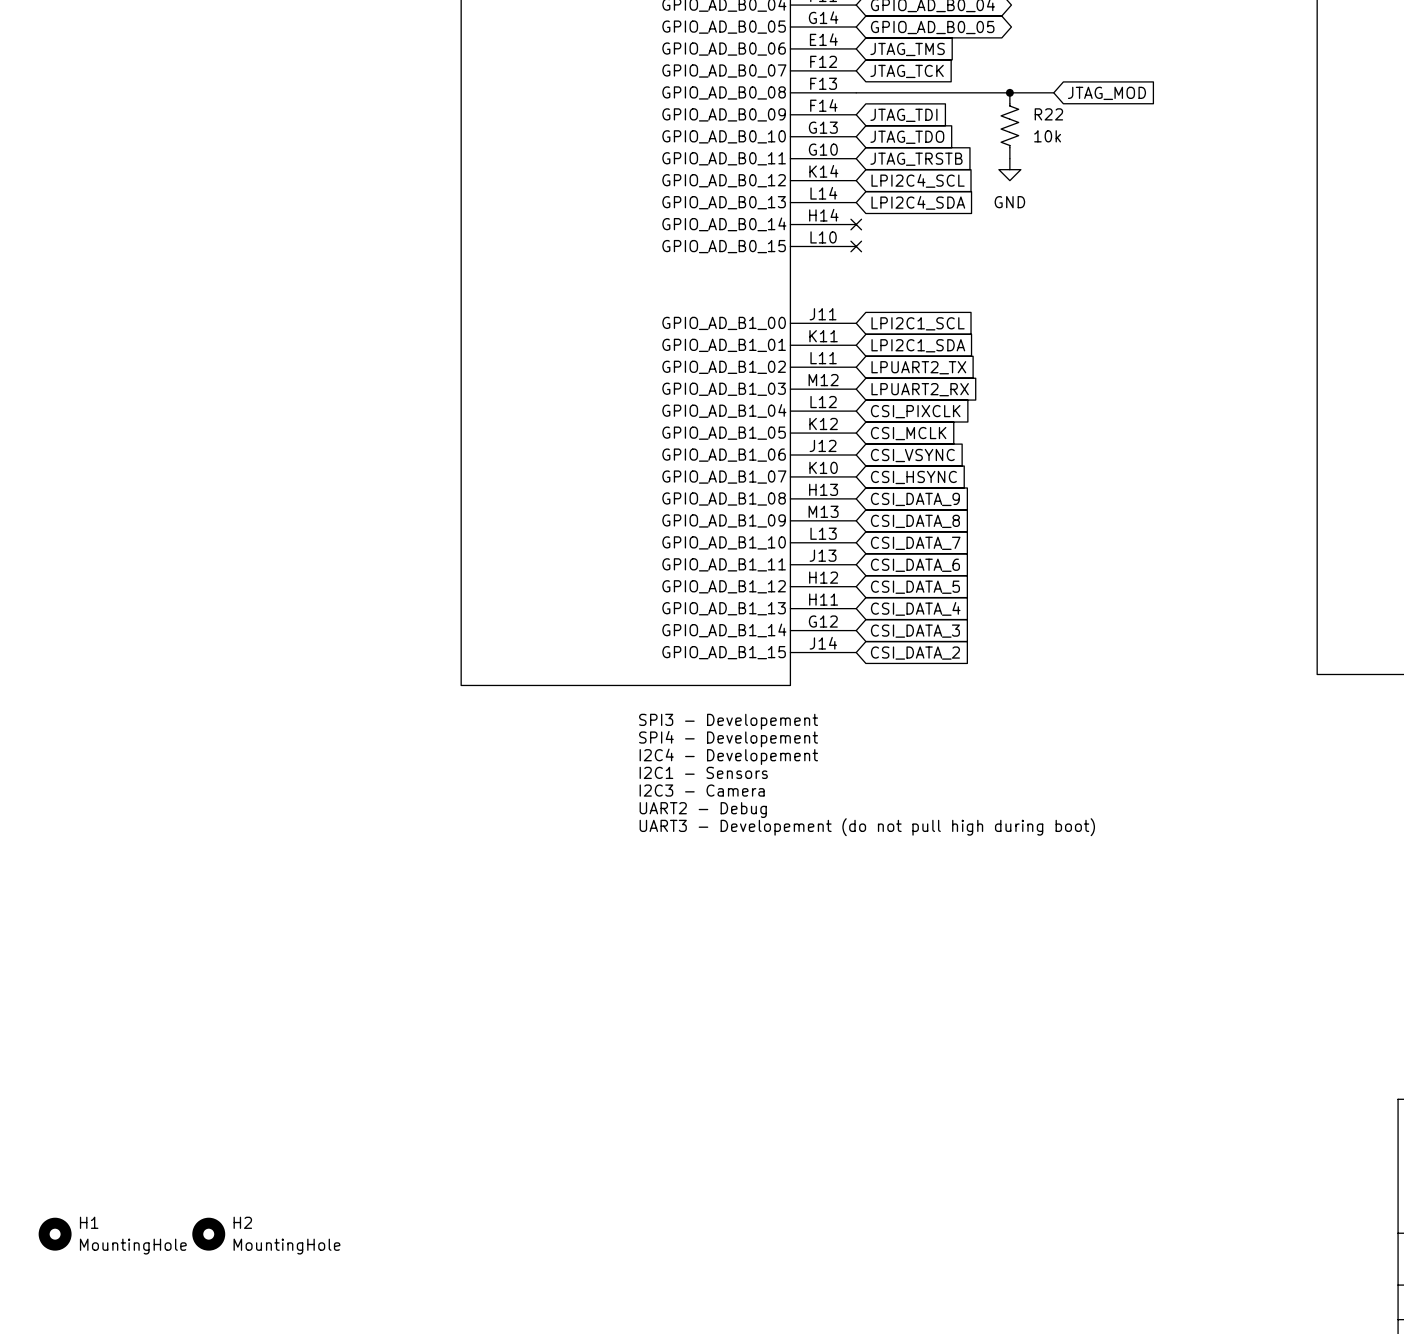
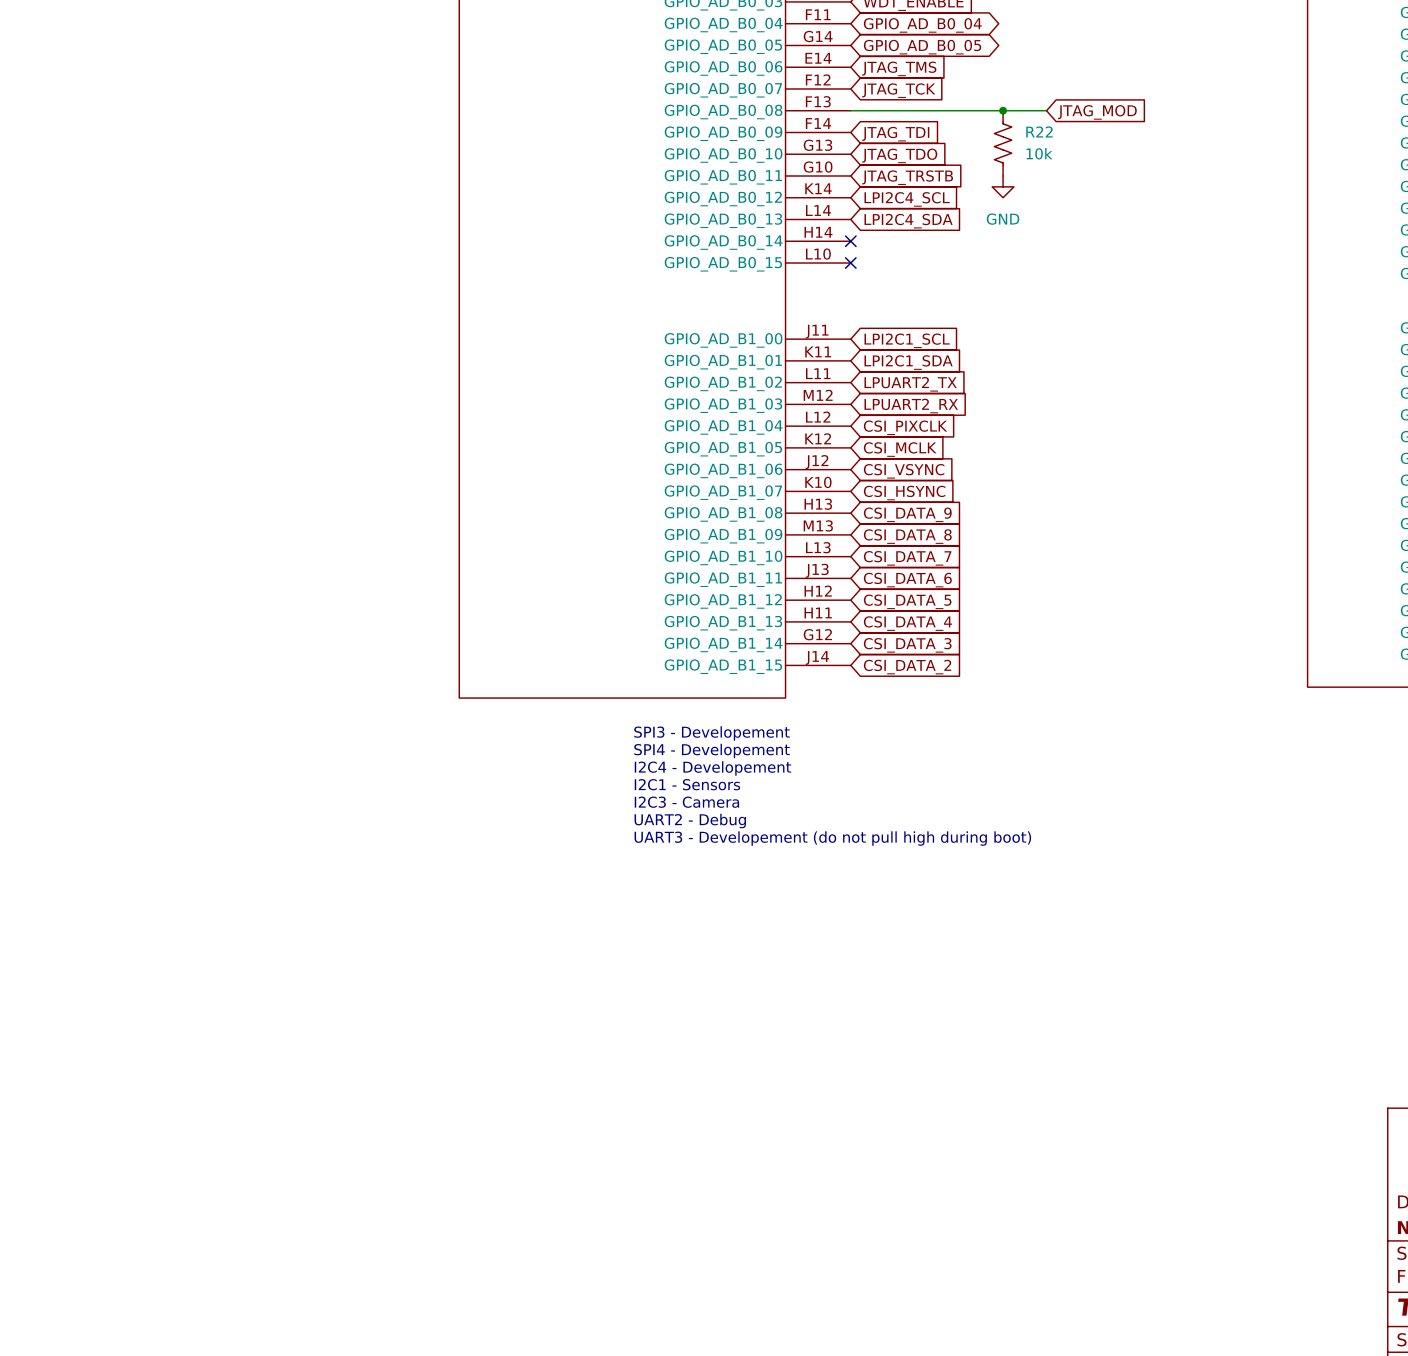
H1: MountingHole (55, 1234) -> none
H2: MountingHole (208, 1234) -> none

